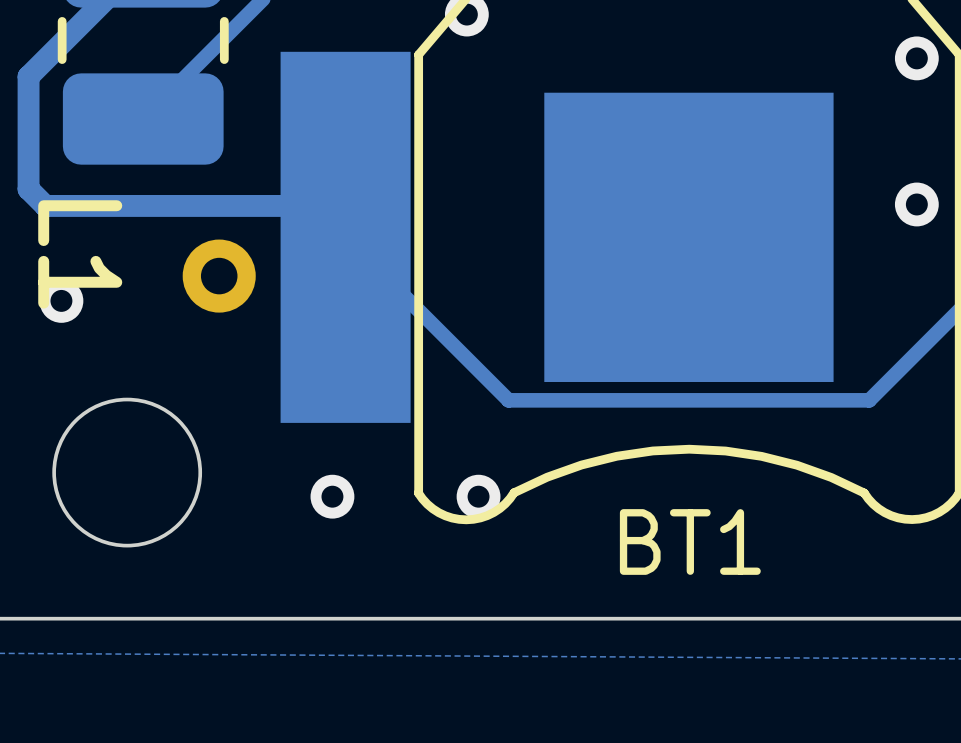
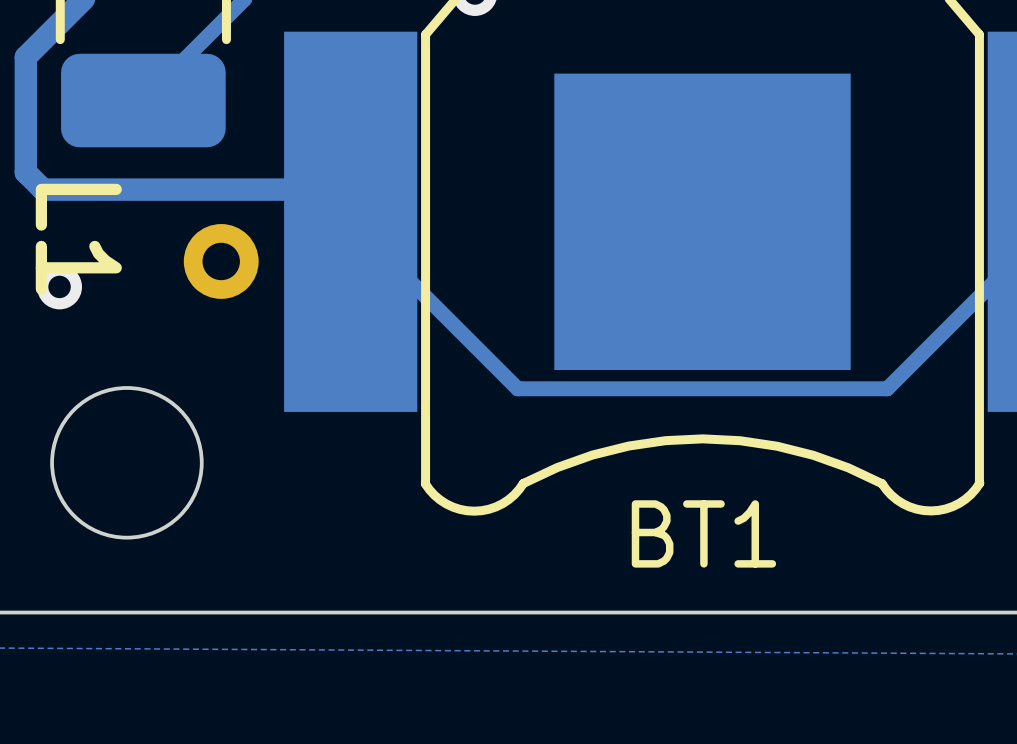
via: (916, 58) -> none
via: (916, 204) -> none
via: (332, 496) -> none
via: (478, 496) -> none

